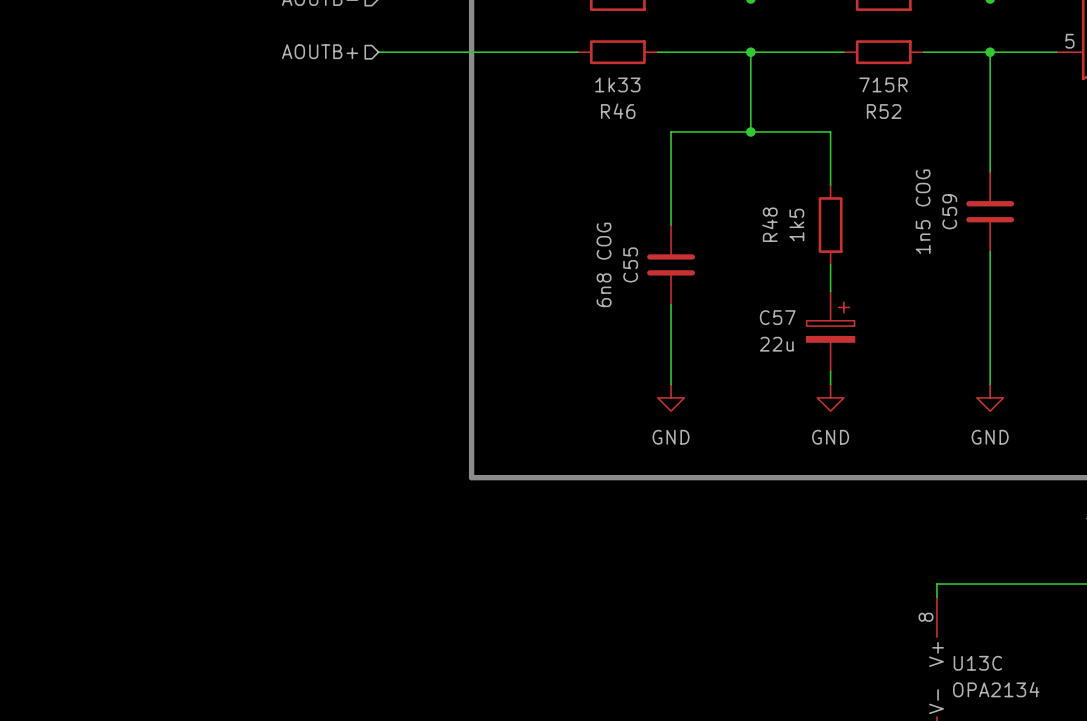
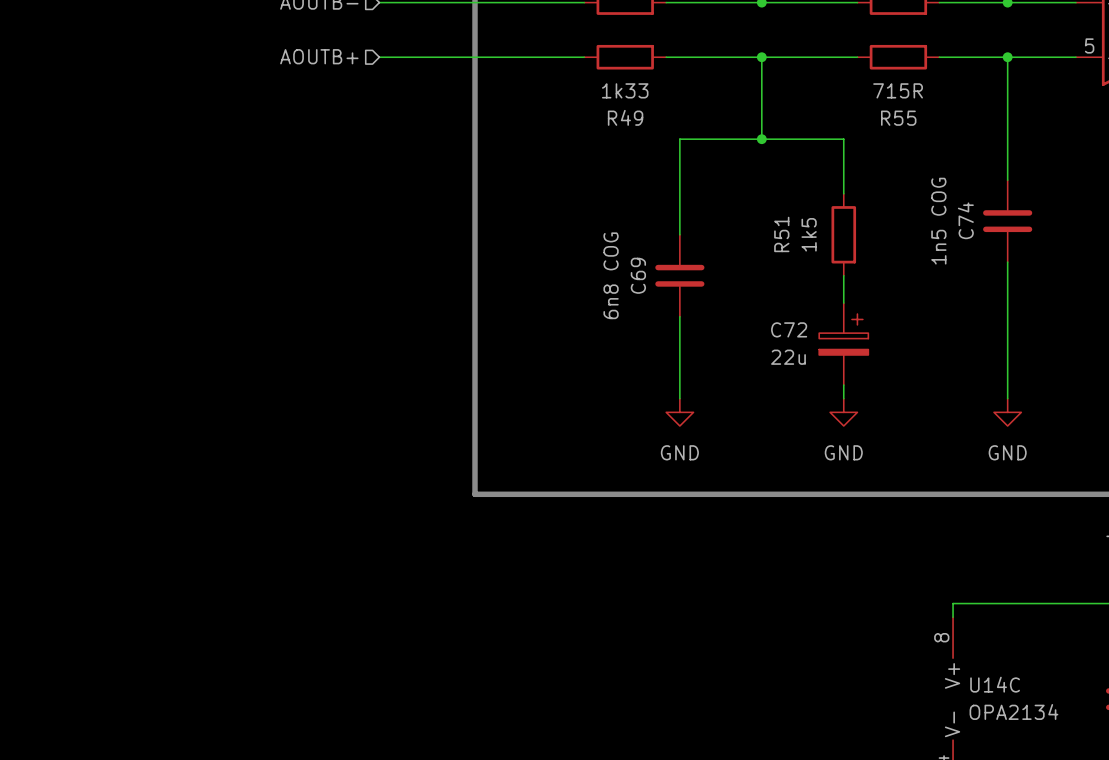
R46 name: R46 (618, 111) -> R49 (625, 117)
R52 name: R52 (884, 111) -> R55 (898, 118)
C59 name: C59 (949, 211) -> C74 (965, 220)
R48 name: R48 (769, 224) -> R51 (781, 234)
C55 name: C55 (630, 264) -> C69 (638, 275)
C57 name: C57 (777, 317) -> C72 (789, 329)
U13C name: U13C (977, 663) -> U14C (995, 684)

